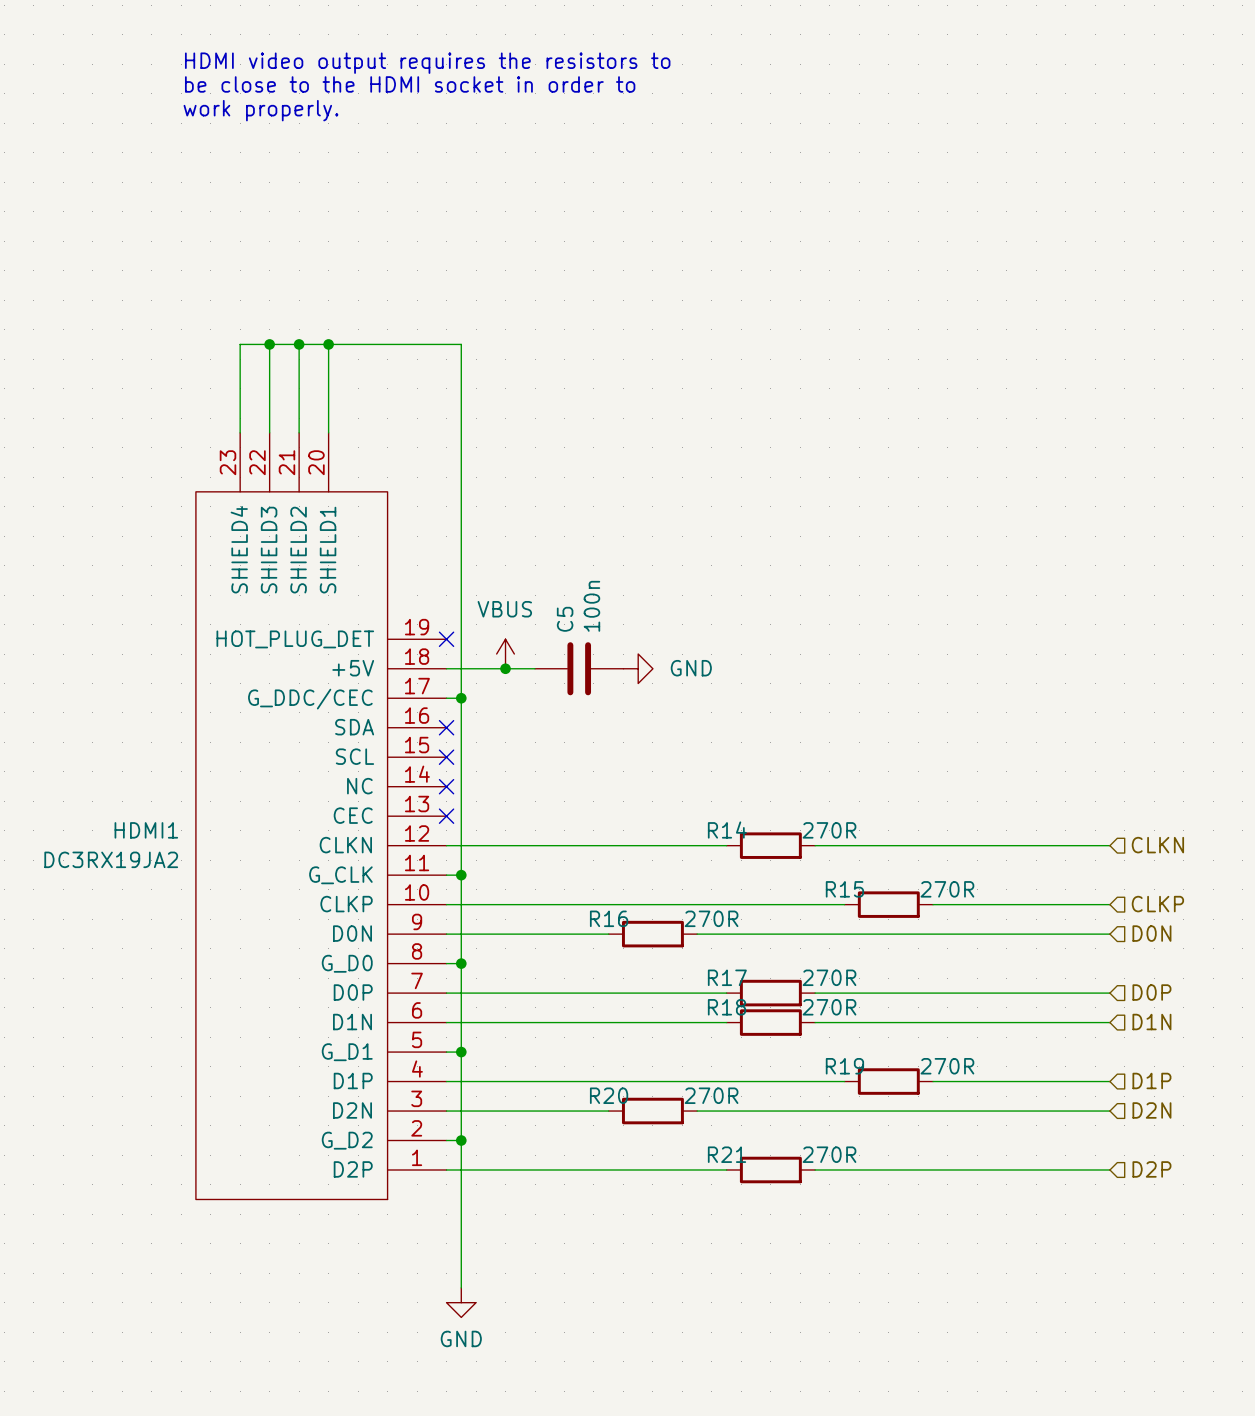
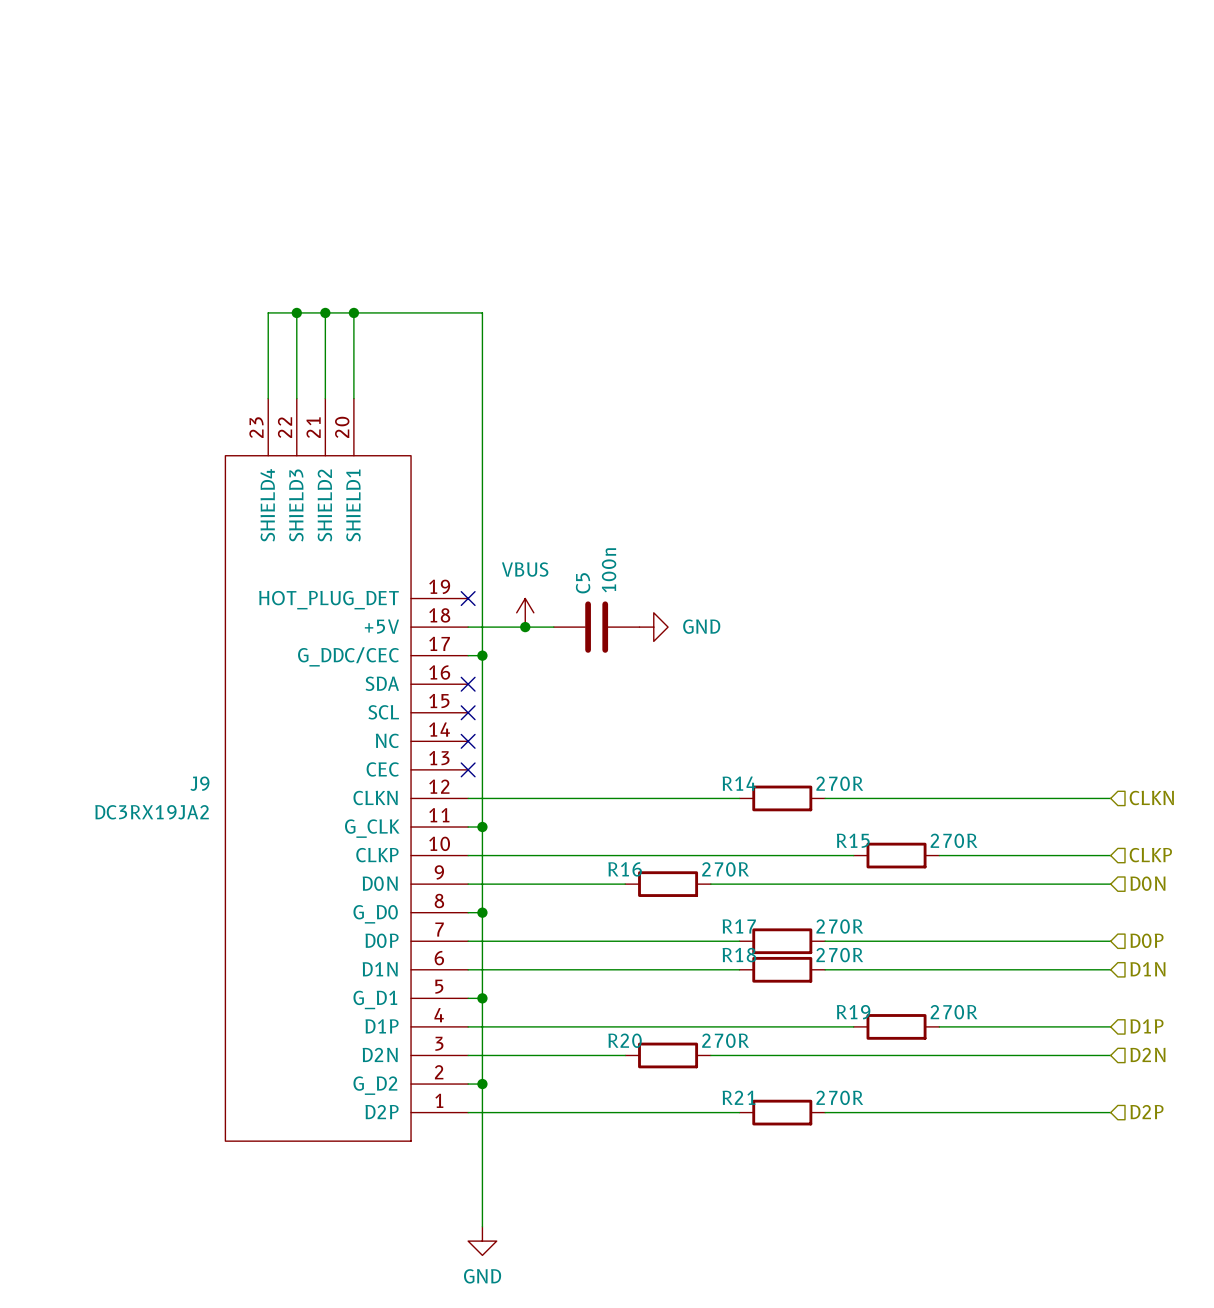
text: HDMI video output requires the resistors to (427, 63) -> none
text: be close to the HDMI socket in order to (410, 84) -> none
text: work properly. (260, 110) -> none
HDMI1 name: HDMI1 (146, 830) -> J9 (199, 783)

